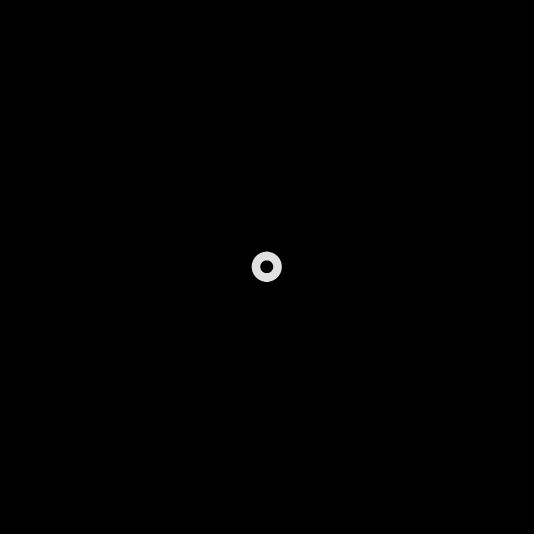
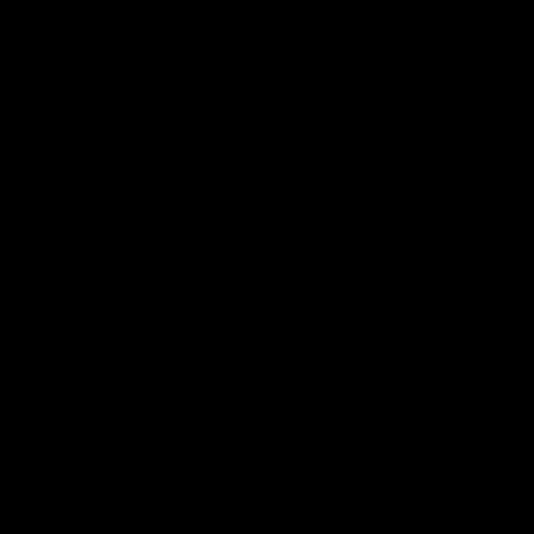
line: (266, 255) (274, 259) (277, 266) (274, 274) (266, 277) (259, 274) (255, 266) (259, 259) (266, 255) -> none

